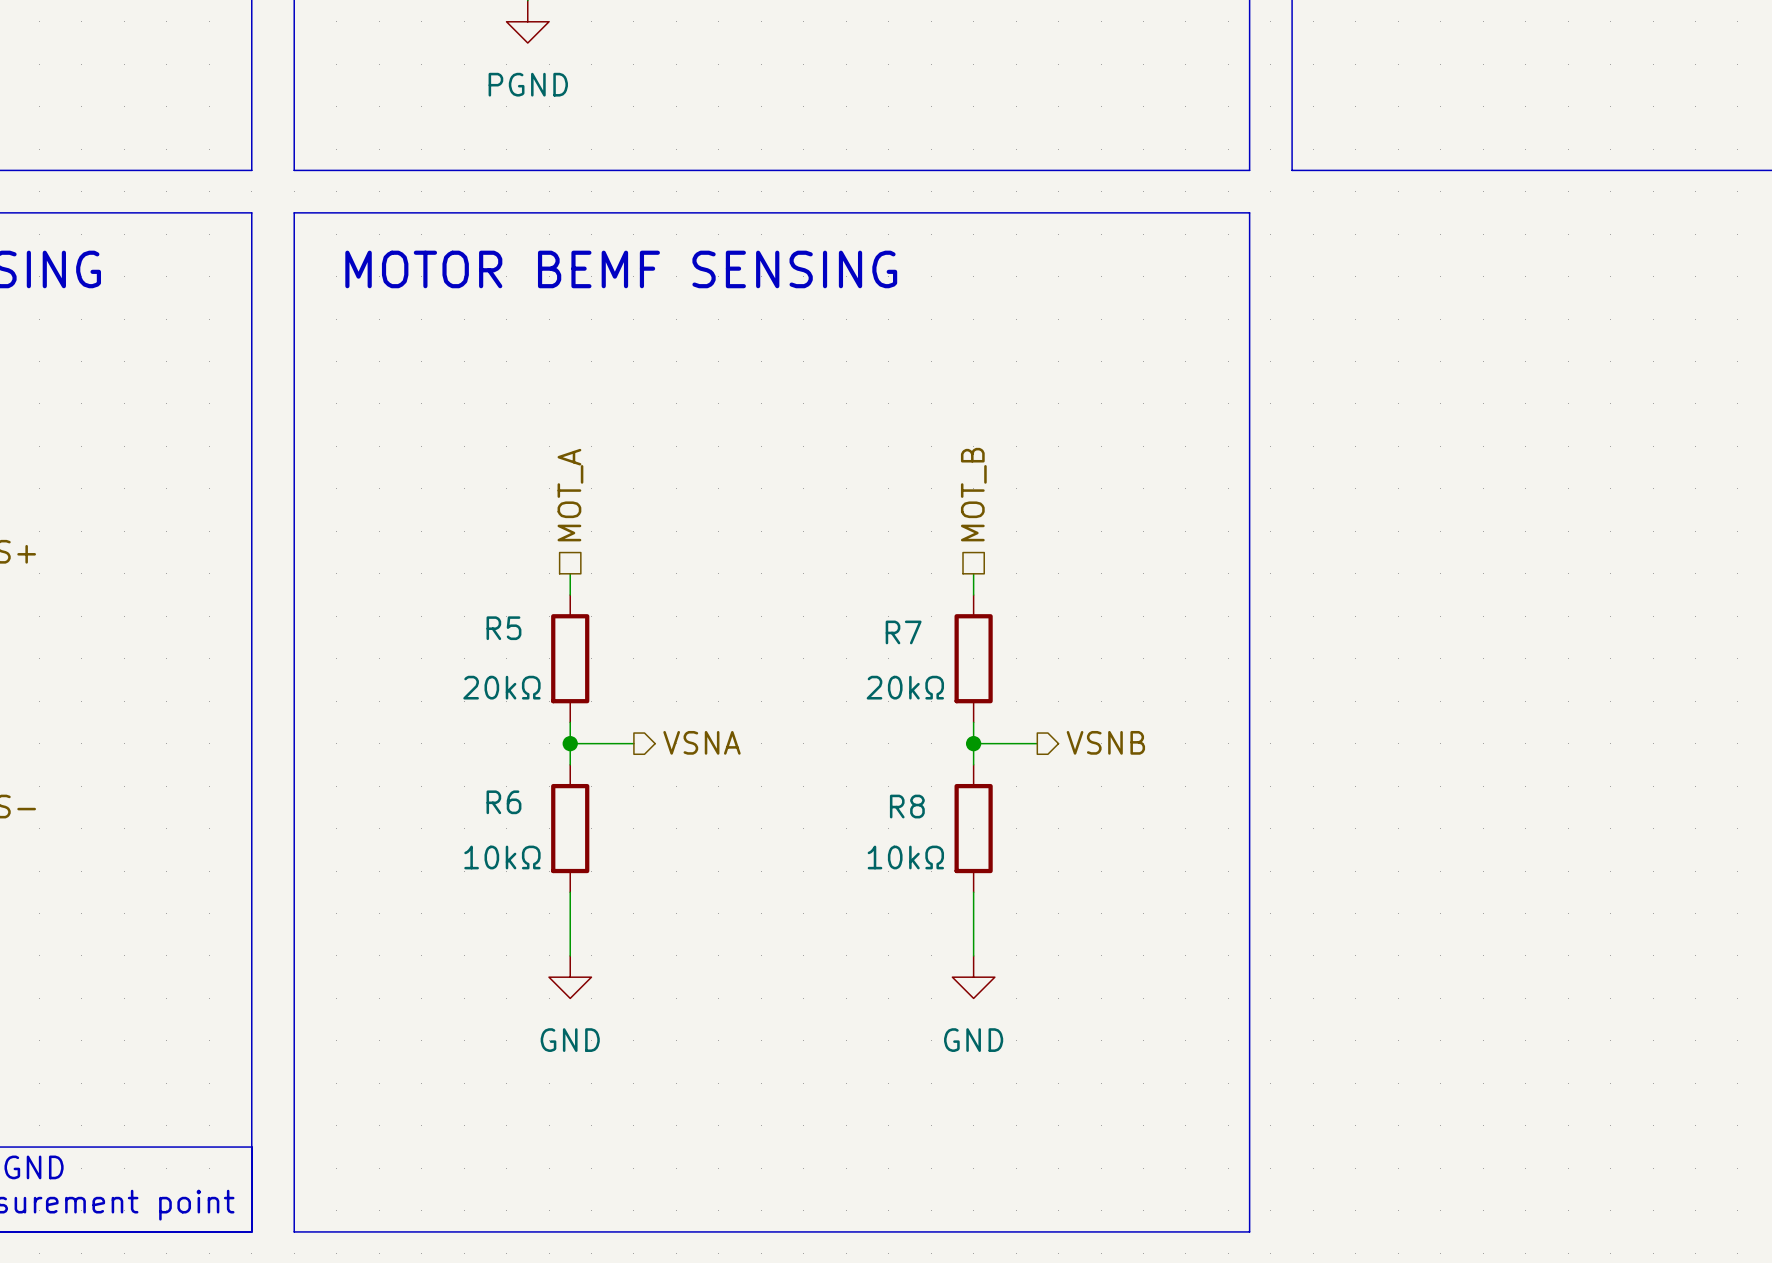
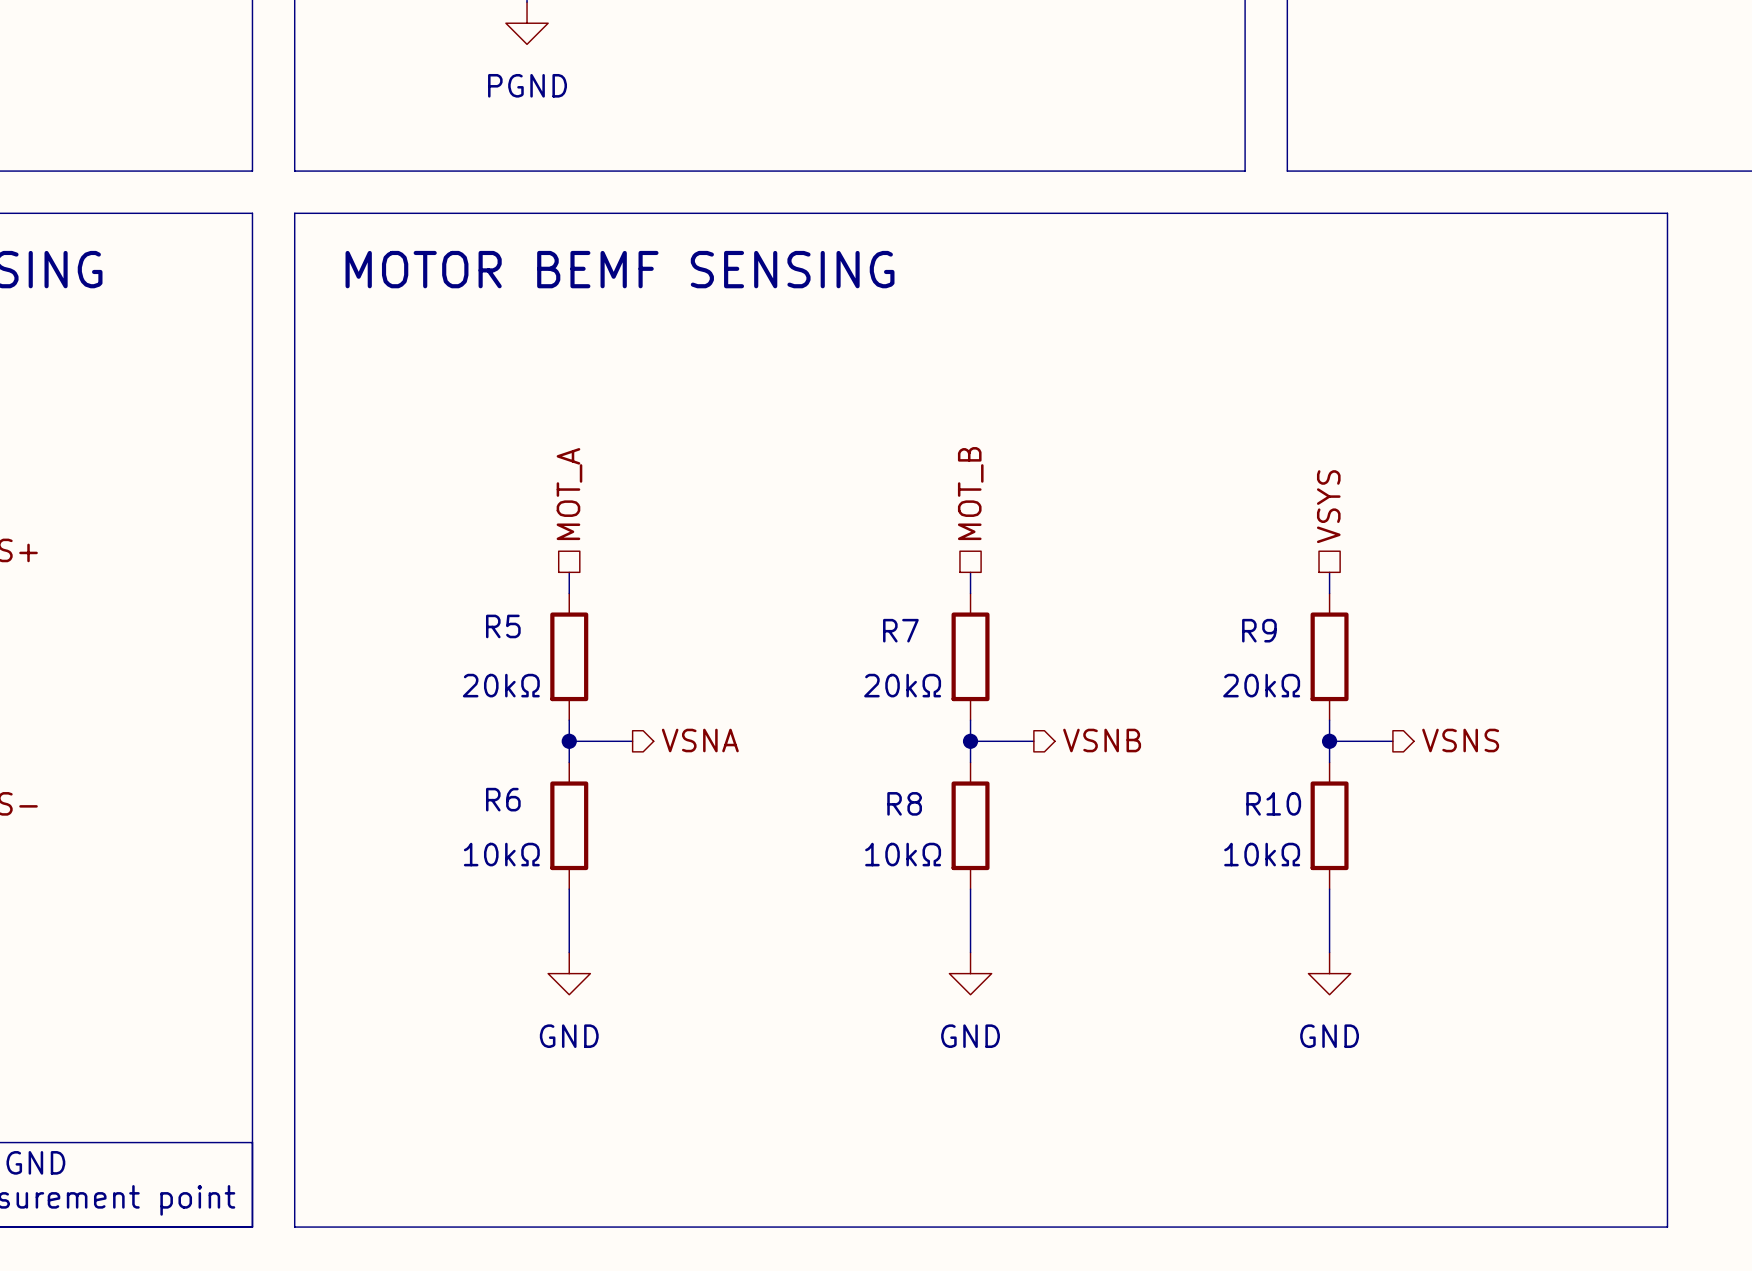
line: (1249, 212) (1249, 1231) -> (1245, 213) (1667, 213) (1667, 1227) (1245, 1227)
hierarchical label: none -> VSYS (1328, 506)
wire: none -> (1329, 572) (1329, 593)
R9: none -> 20kΩ (1329, 656)
wire: none -> (1329, 720) (1329, 762)
hierarchical label: none -> VSNS (1460, 740)
wire: none -> (1329, 741) (1392, 741)
junction: none -> (1329, 741)
R10: none -> 10kΩ (1329, 825)
wire: none -> (1329, 889) (1329, 952)
power symbol: none -> GND (1329, 973)

